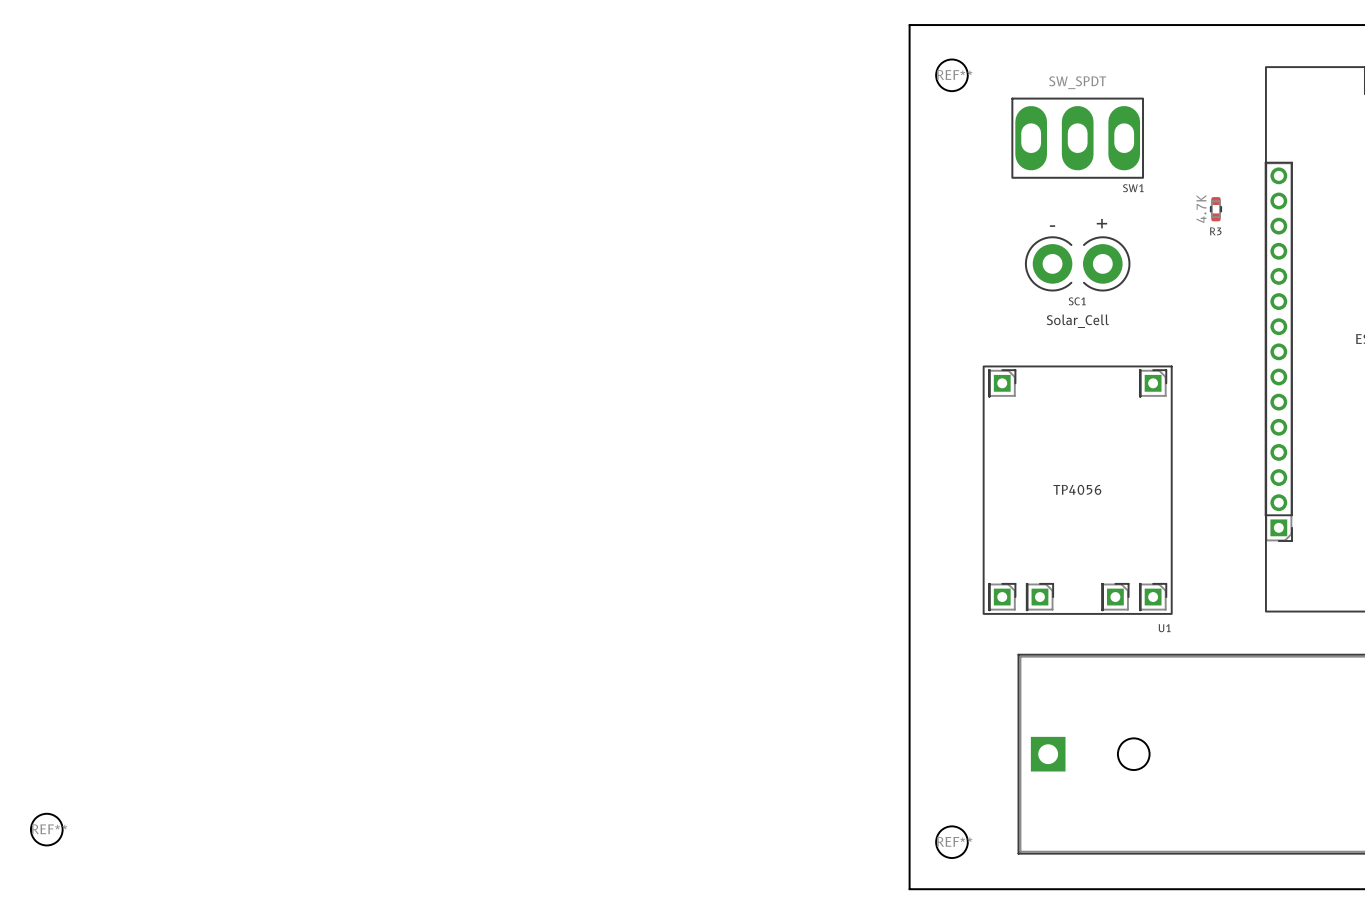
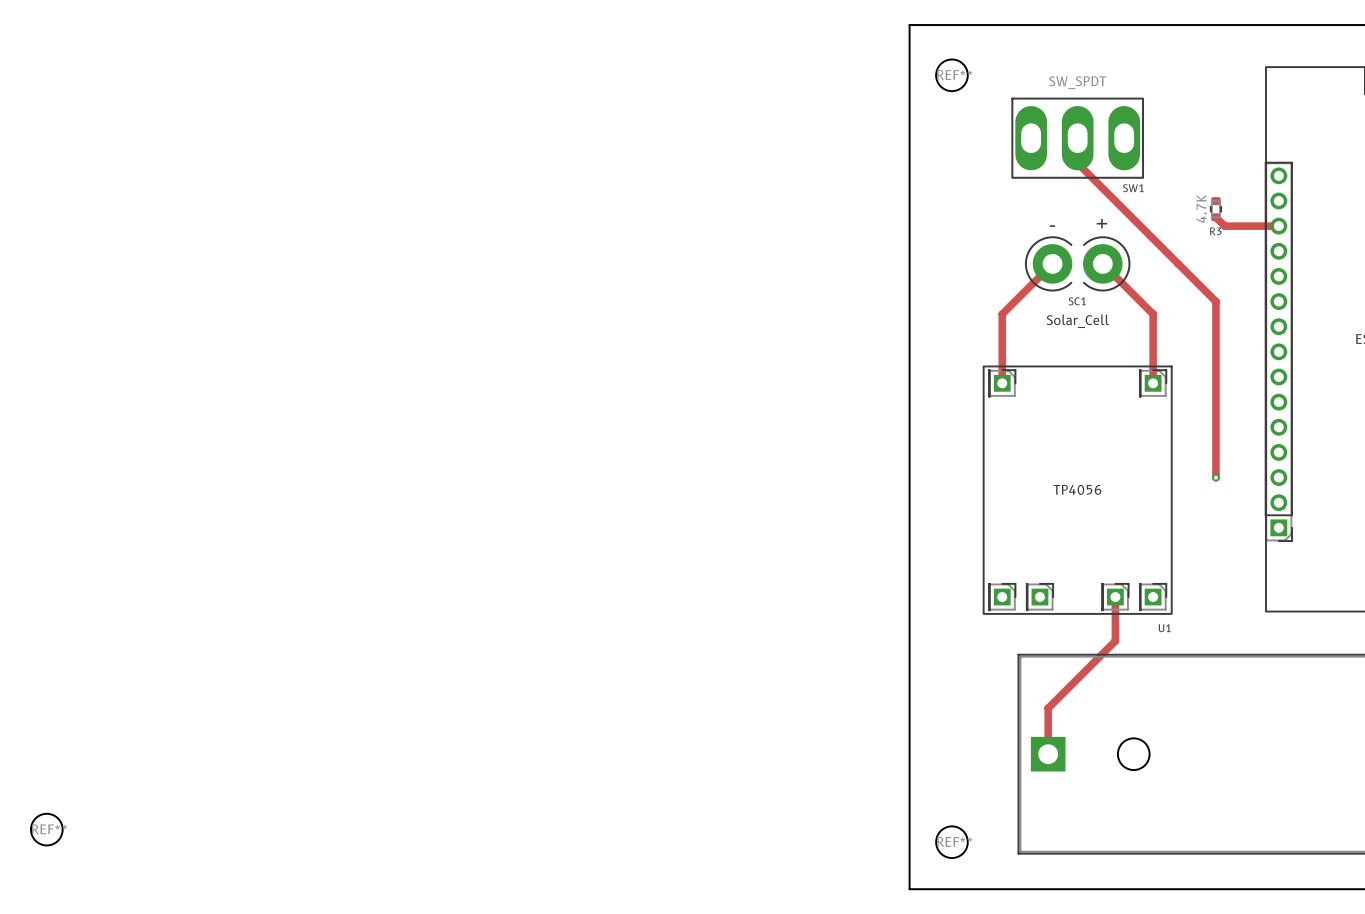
track: none -> (1077, 138) (1077, 163) (1215, 301) (1215, 477)
track: none -> (1215, 217) (1224, 226) (1278, 226)
track: none -> (1052, 263) (1002, 314) (1002, 383)
track: none -> (1102, 263) (1153, 314) (1153, 383)
via: none -> (1215, 477)
track: none -> (1115, 597) (1115, 641) (1048, 708) (1048, 754)

